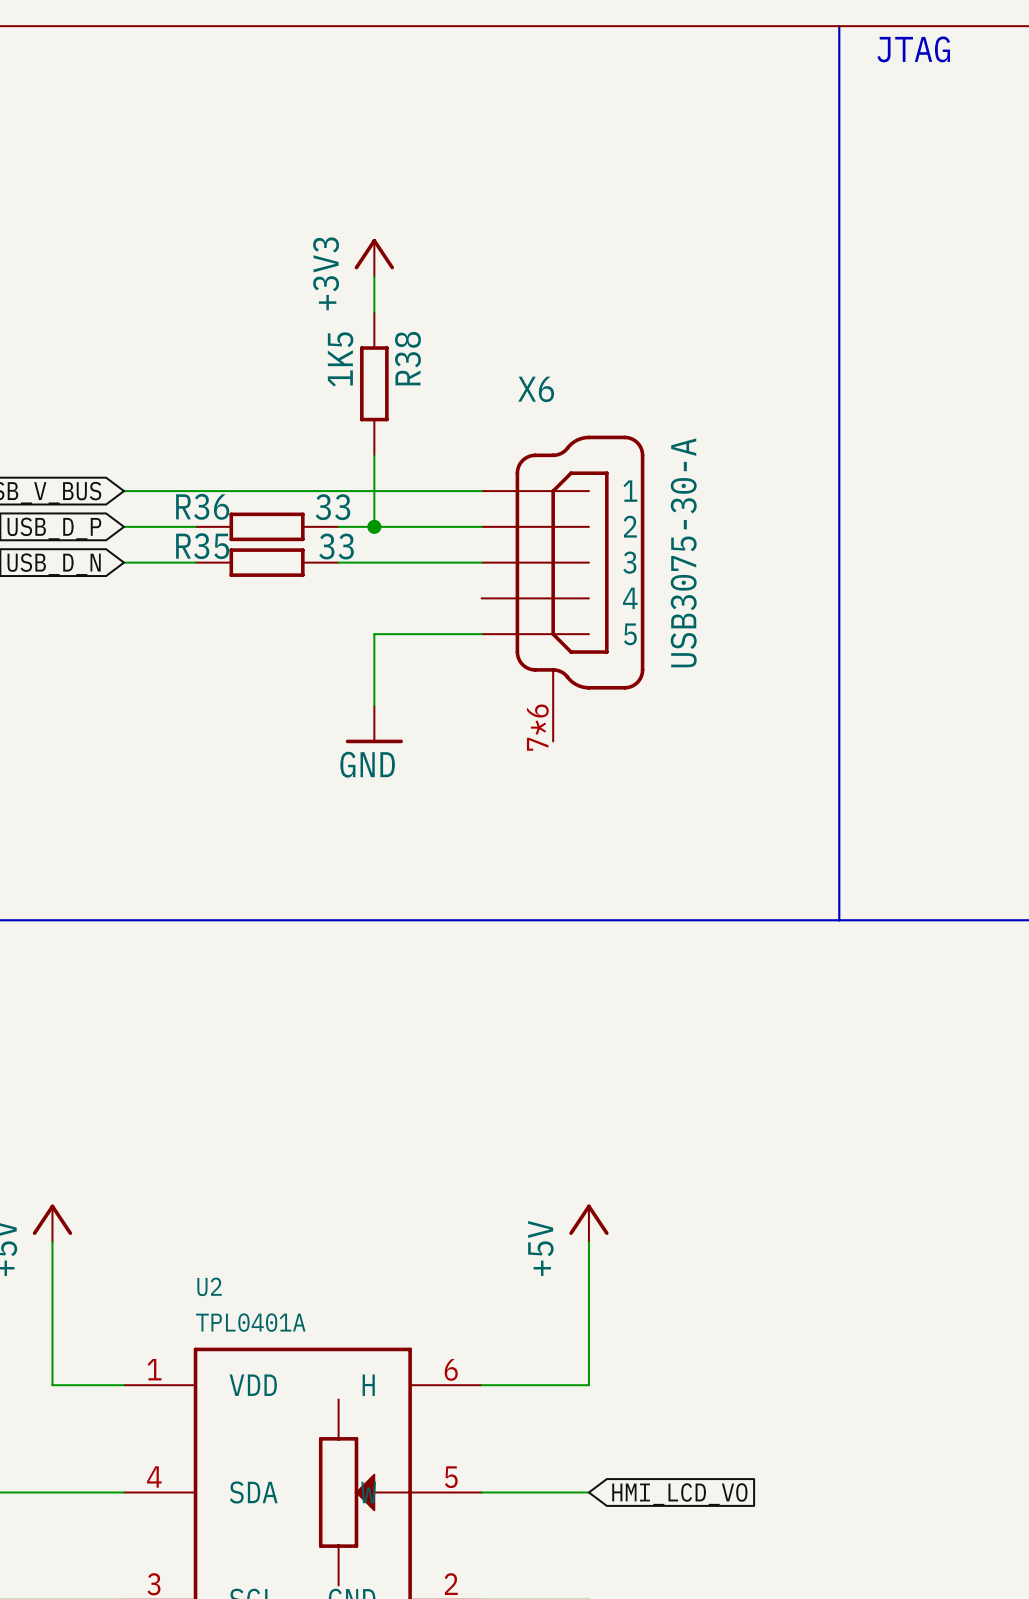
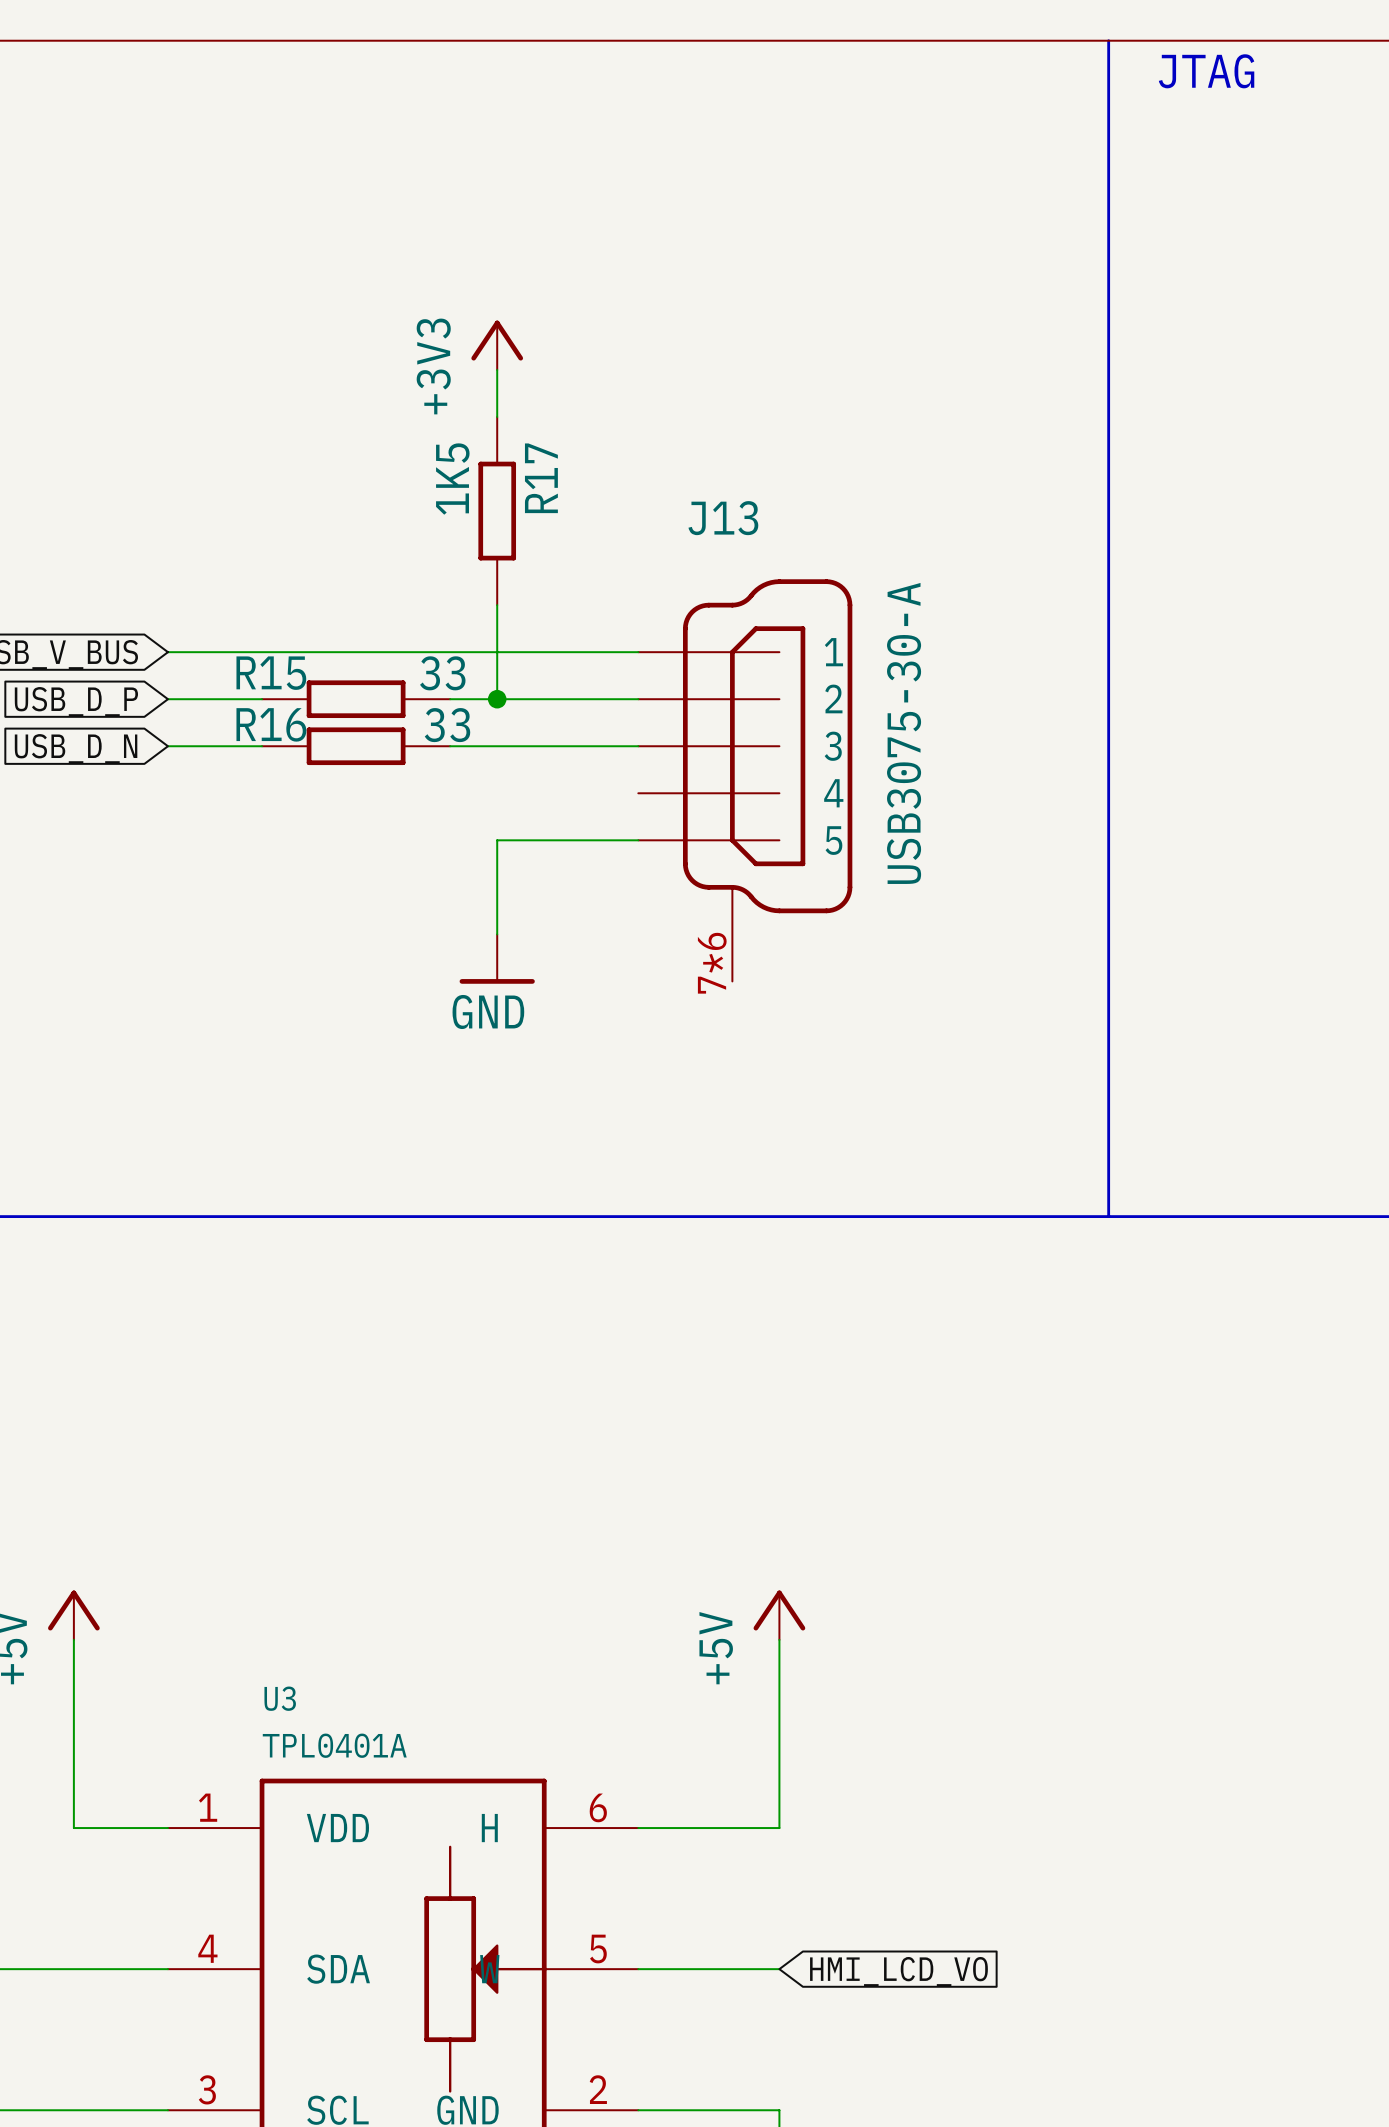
R38 name: R38 (407, 358) -> R17 (541, 478)
X6 name: X6 (536, 389) -> J13 (723, 518)
R36 name: R36 (202, 506) -> R15 (271, 673)
R35 name: R35 (202, 546) -> R16 (271, 724)
U2 name: U2 (209, 1286) -> U3 (280, 1698)

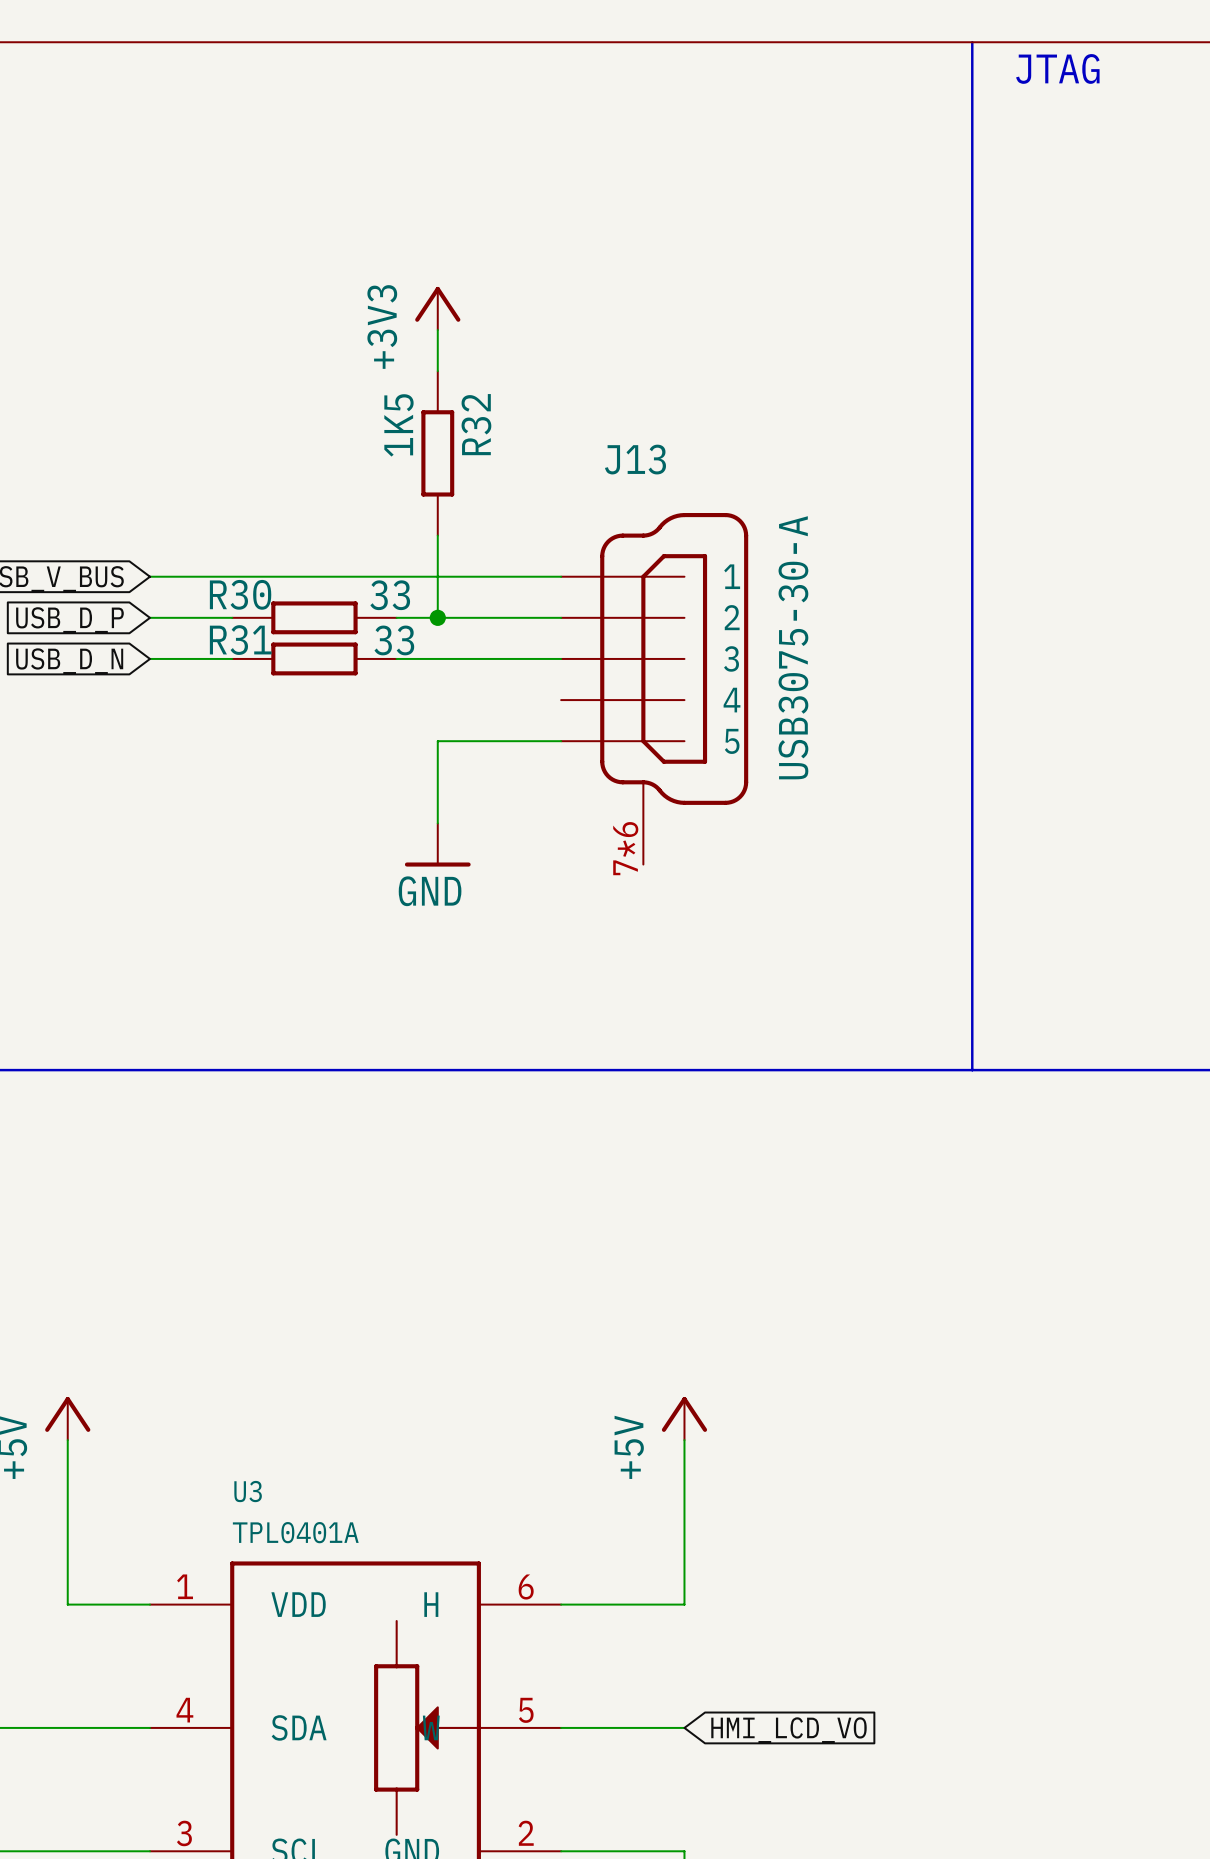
R17 name: R17 (541, 478) -> R32 (476, 424)
R15 name: R15 (271, 673) -> R30 (240, 594)
R16 name: R16 (271, 724) -> R31 (240, 640)

